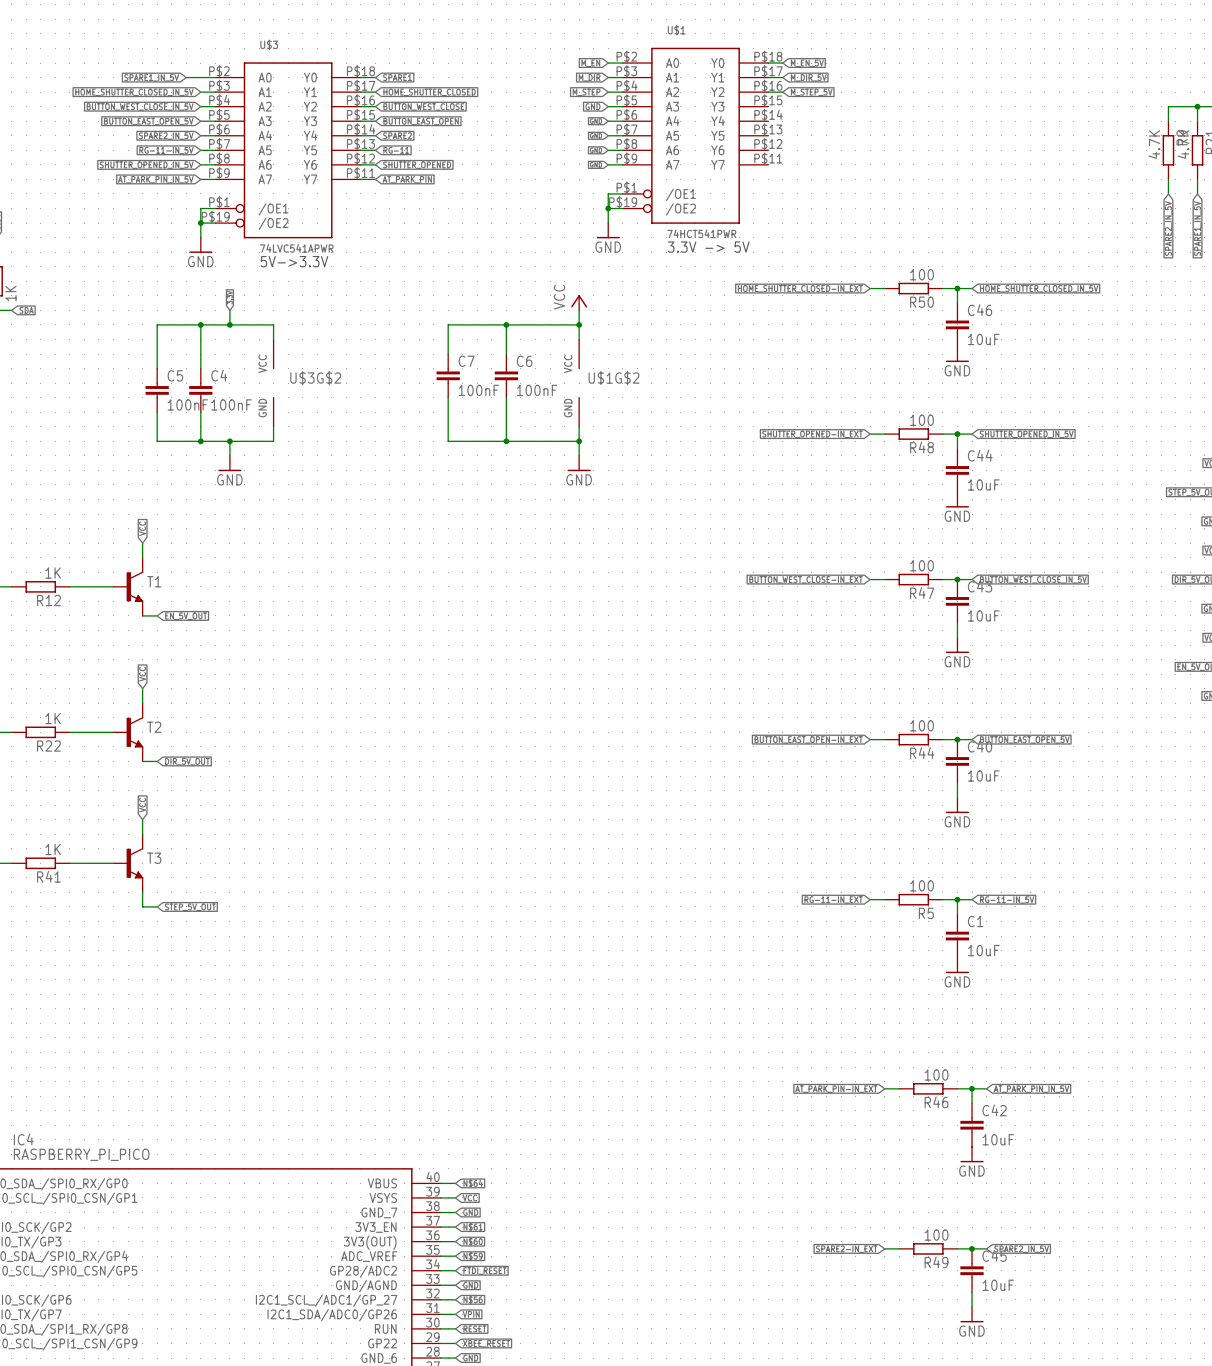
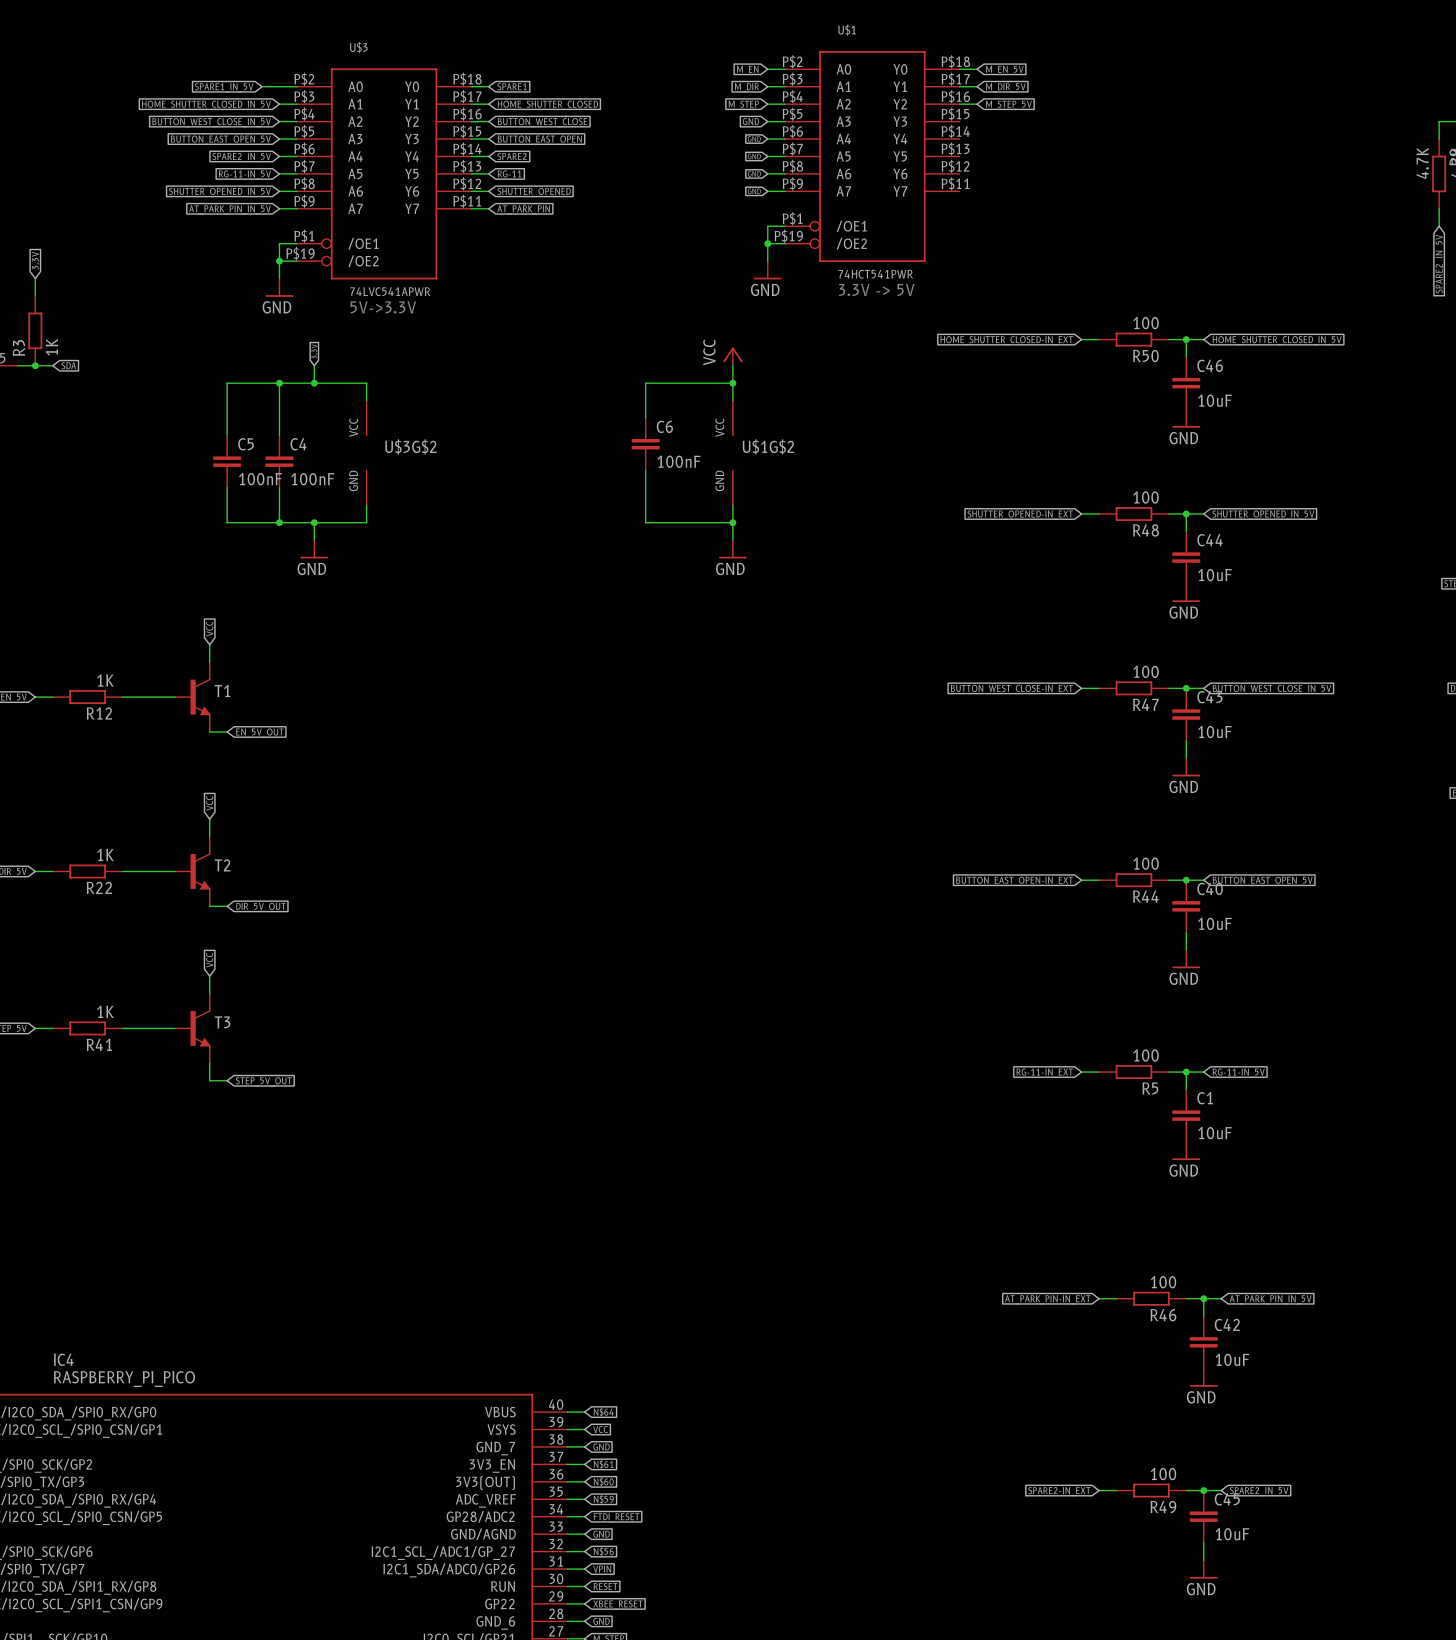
wire: (506, 324) (448, 324) (448, 354) -> none
junction: (506, 324) -> none
C7: 100nF (448, 375) -> none
wire: (448, 397) (448, 441) (506, 441) -> none
junction: (506, 441) -> none

